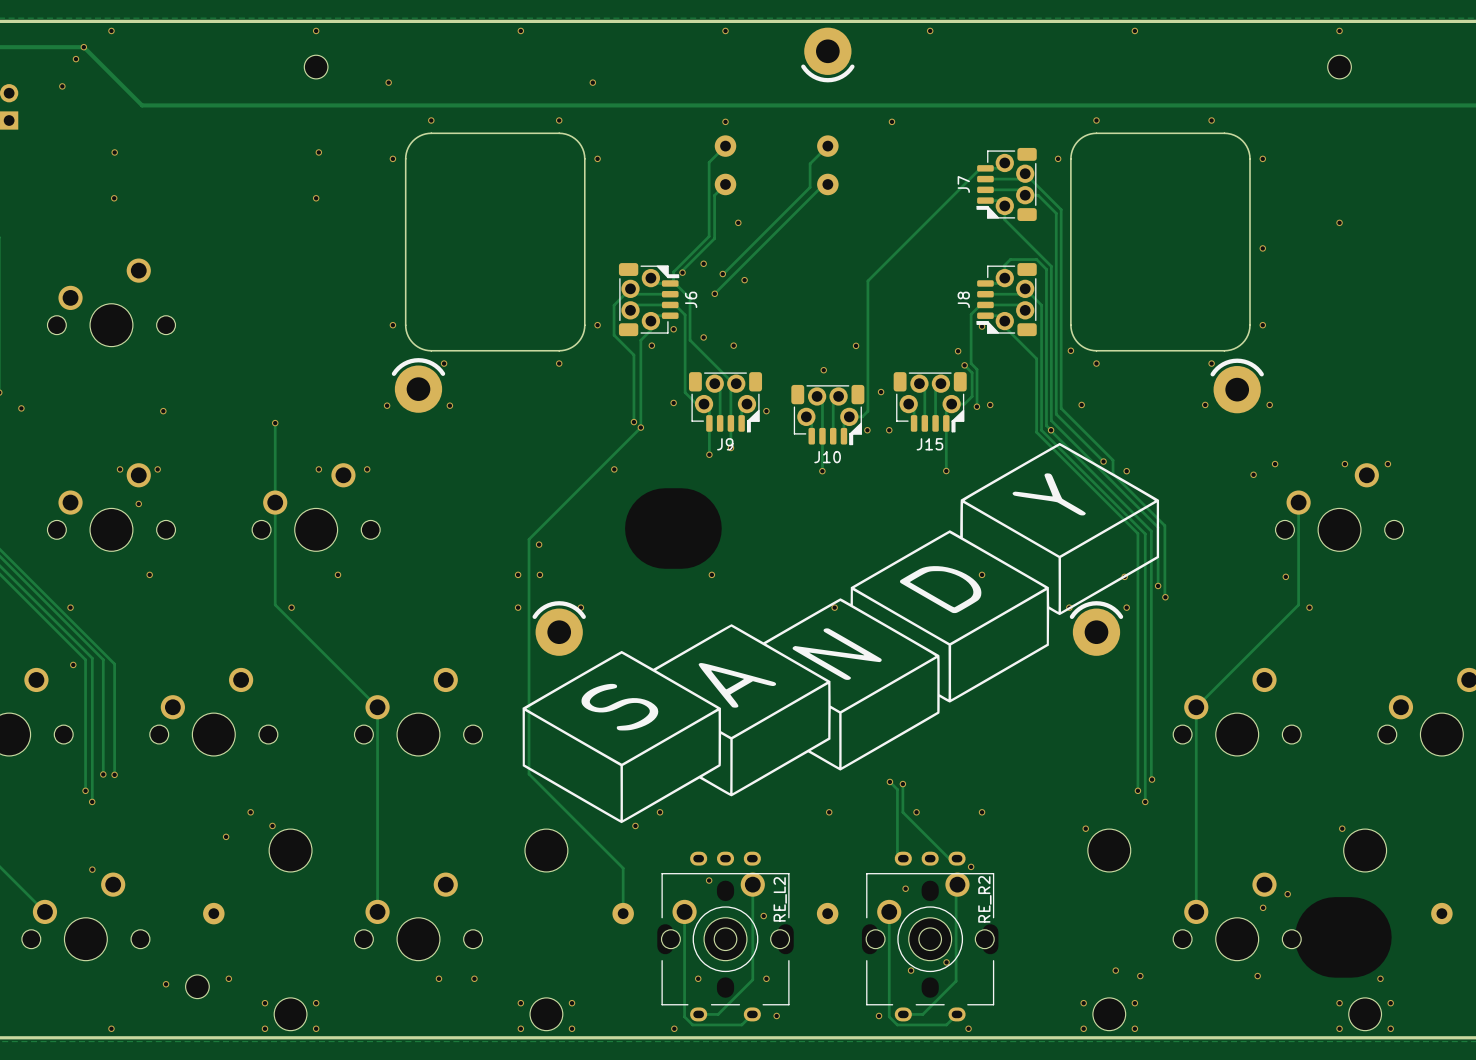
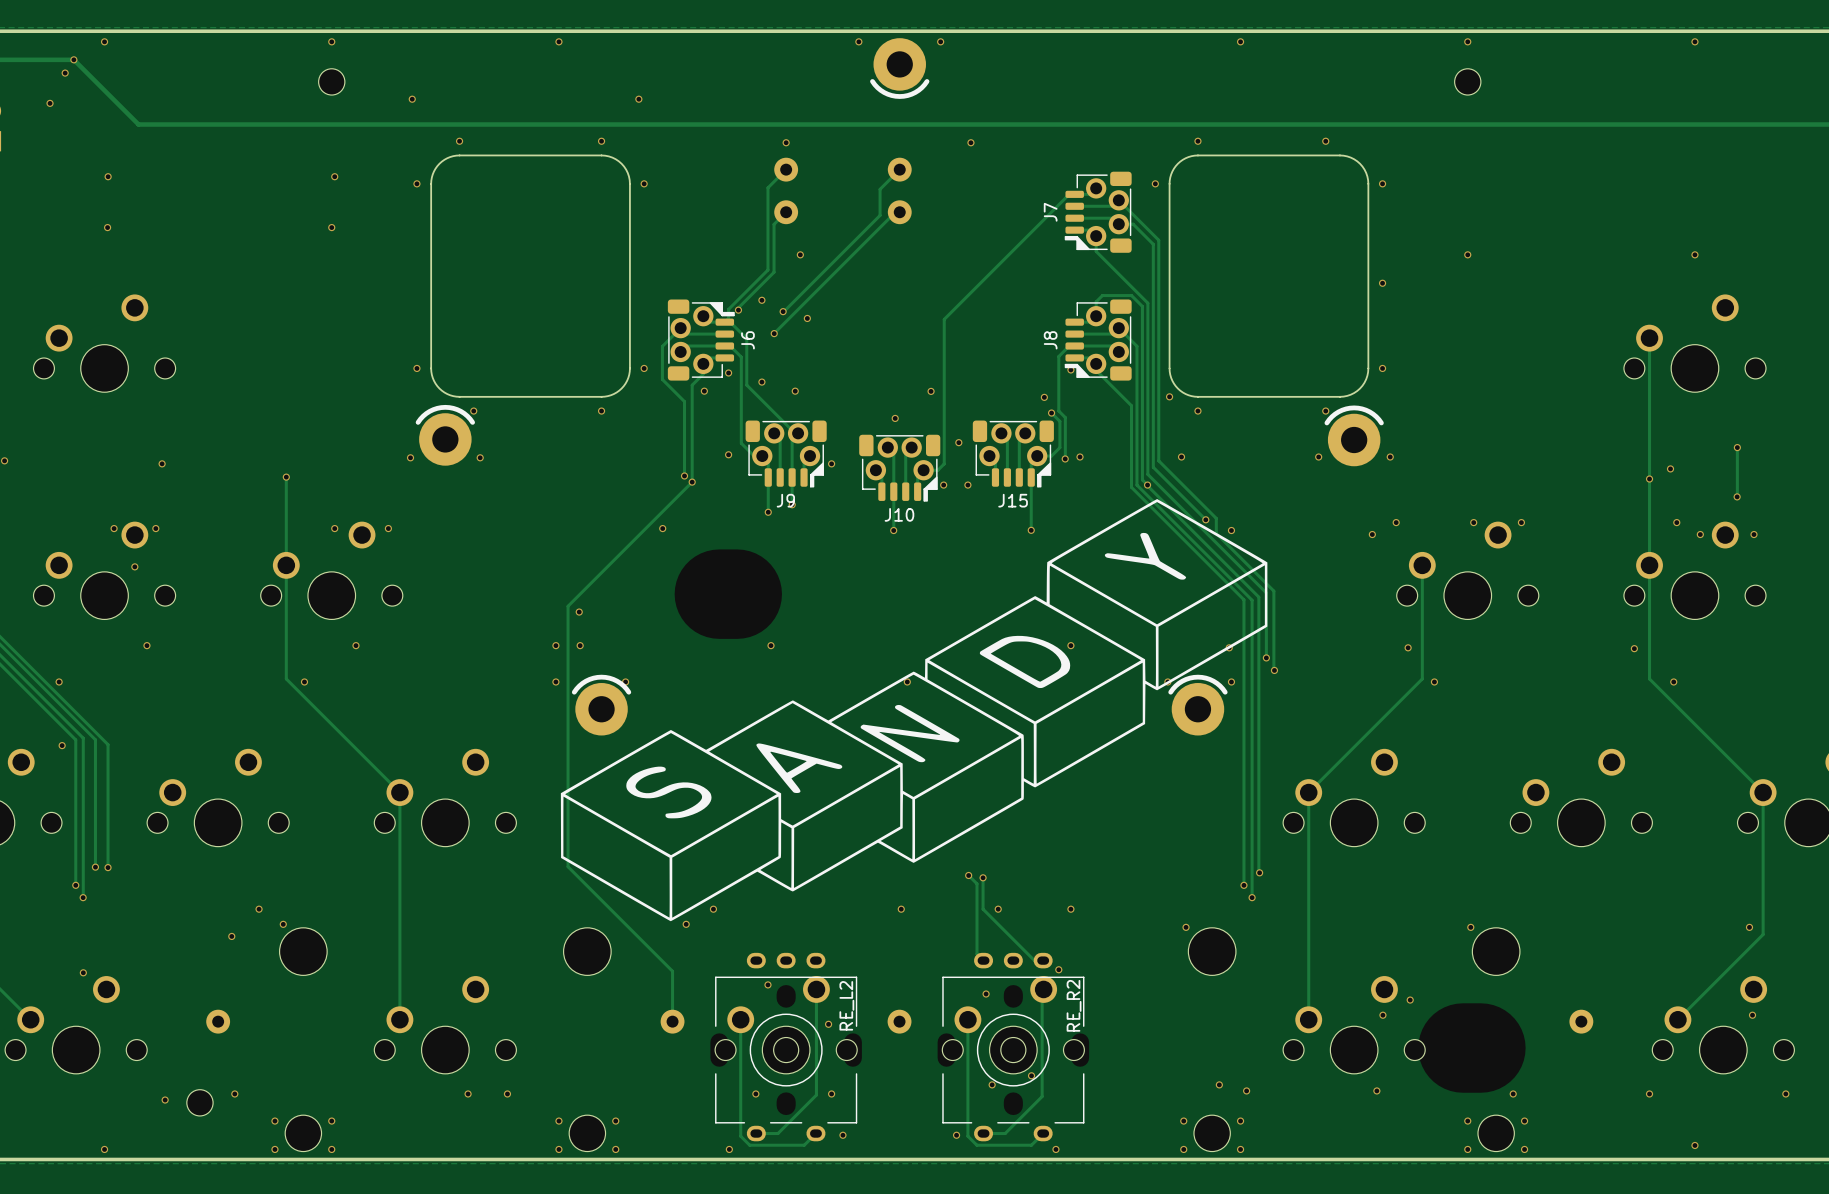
via: (725, 30) -> none
via: none -> (858, 41)
via: none -> (940, 41)
via: (930, 30) -> none

